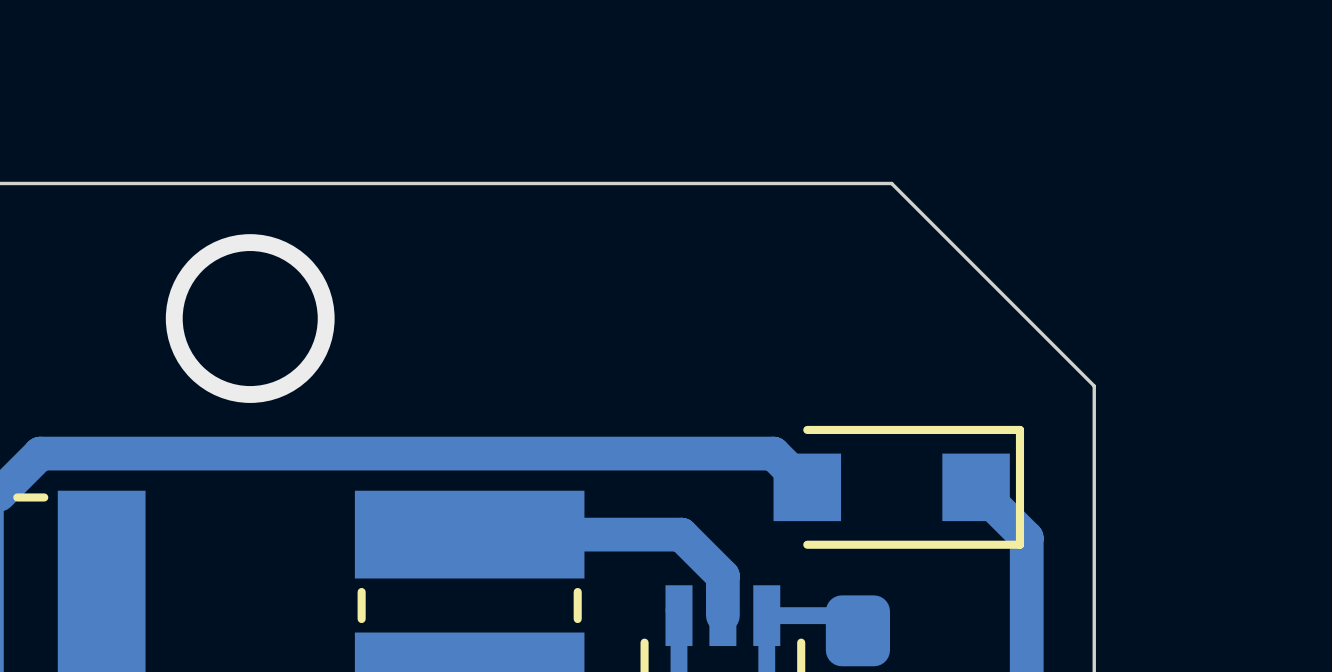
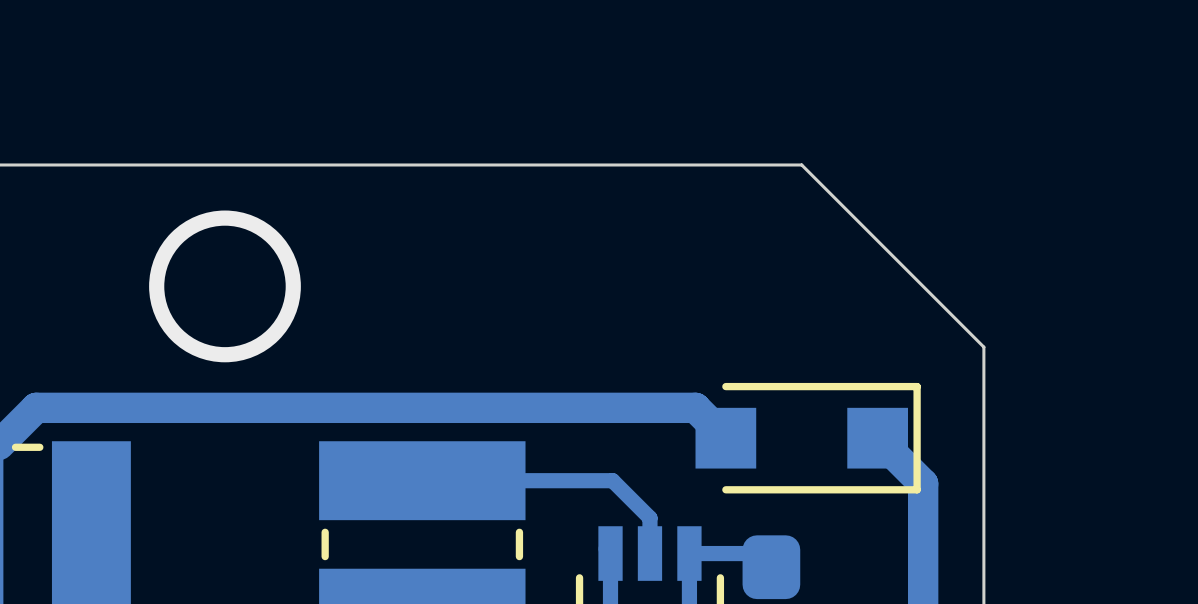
track width: thick (469, 534) (681, 534) (722, 576) (722, 615) -> thin (422, 480) (612, 480) (649, 518) (649, 553)

